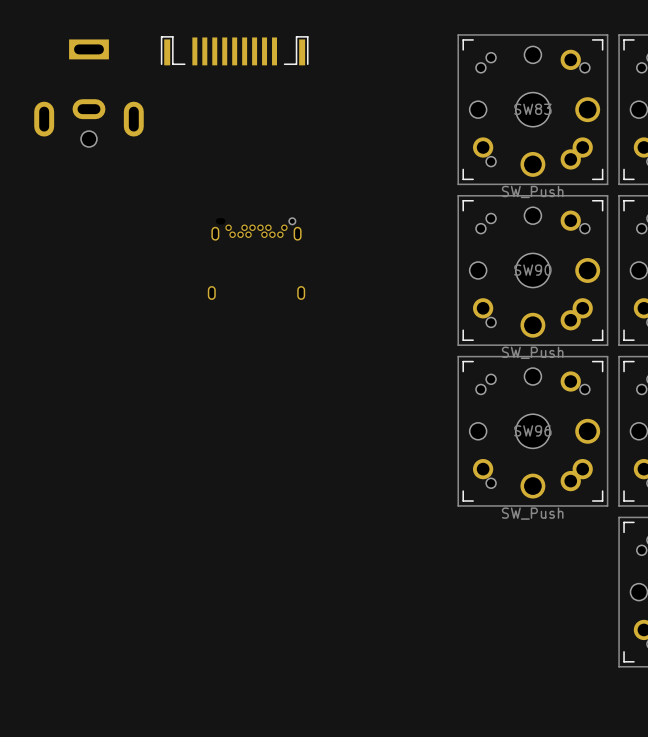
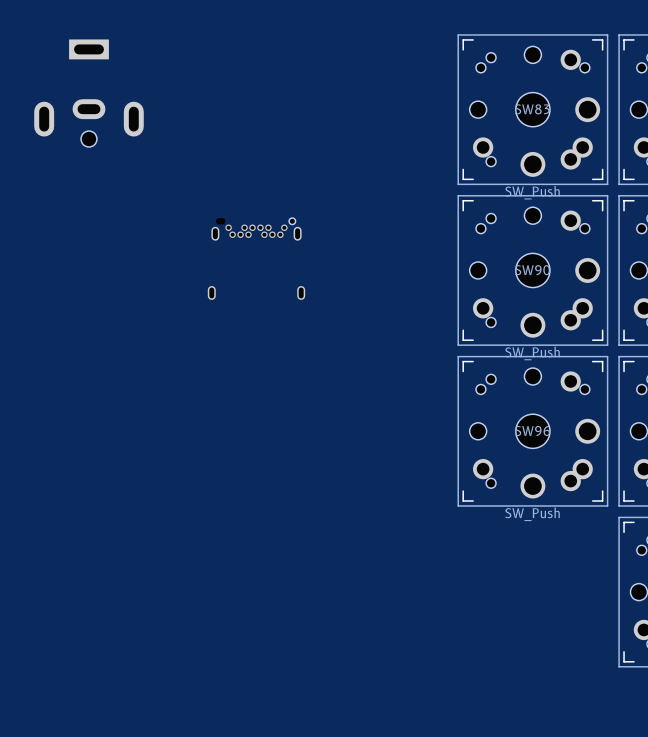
part: (234, 50) -> none

